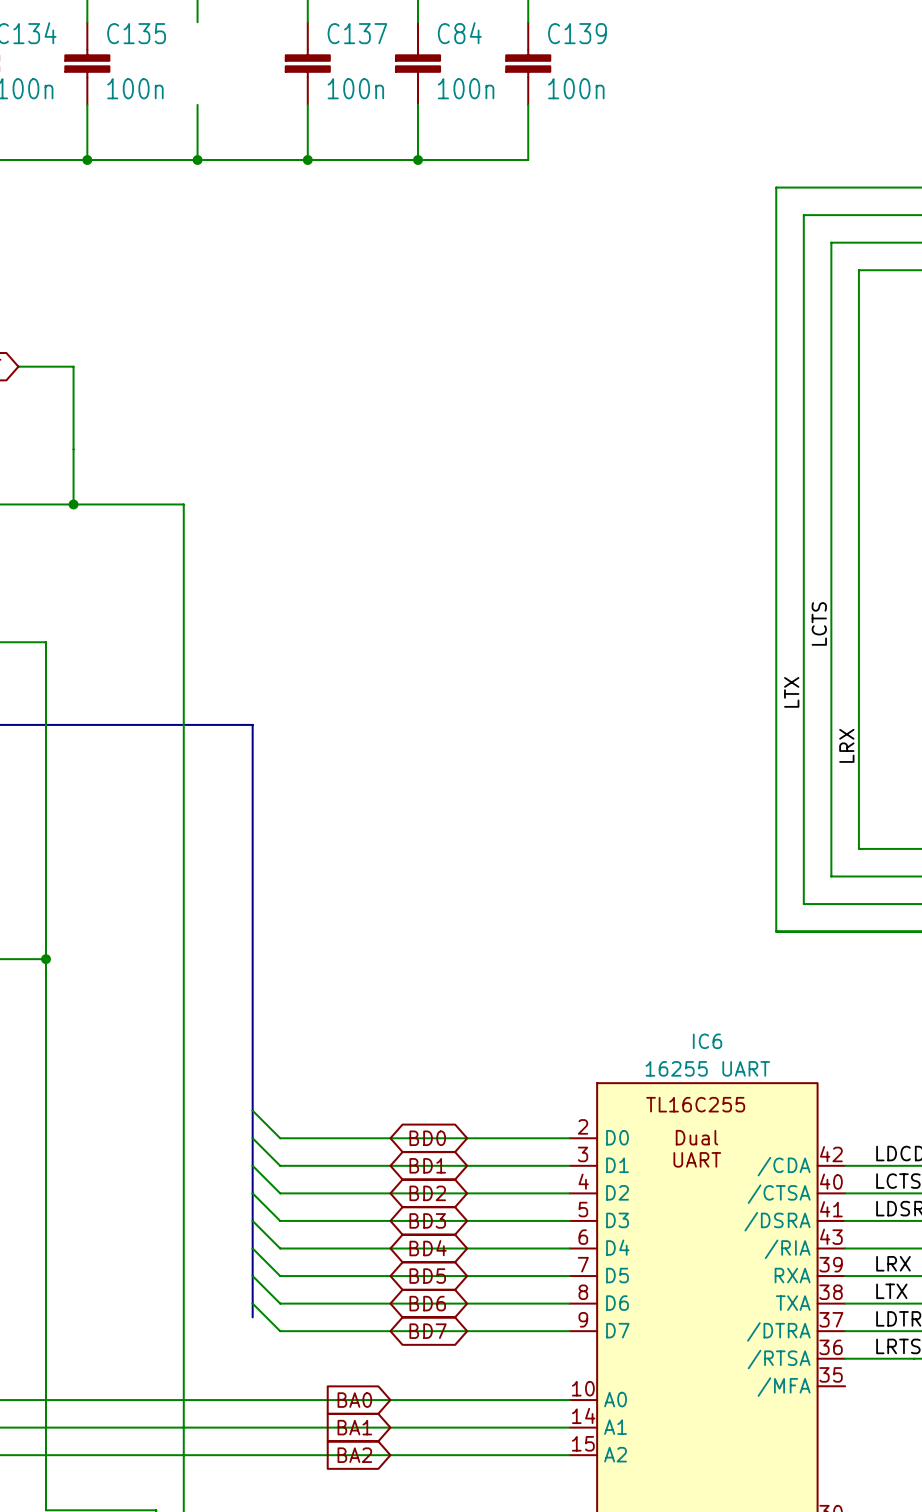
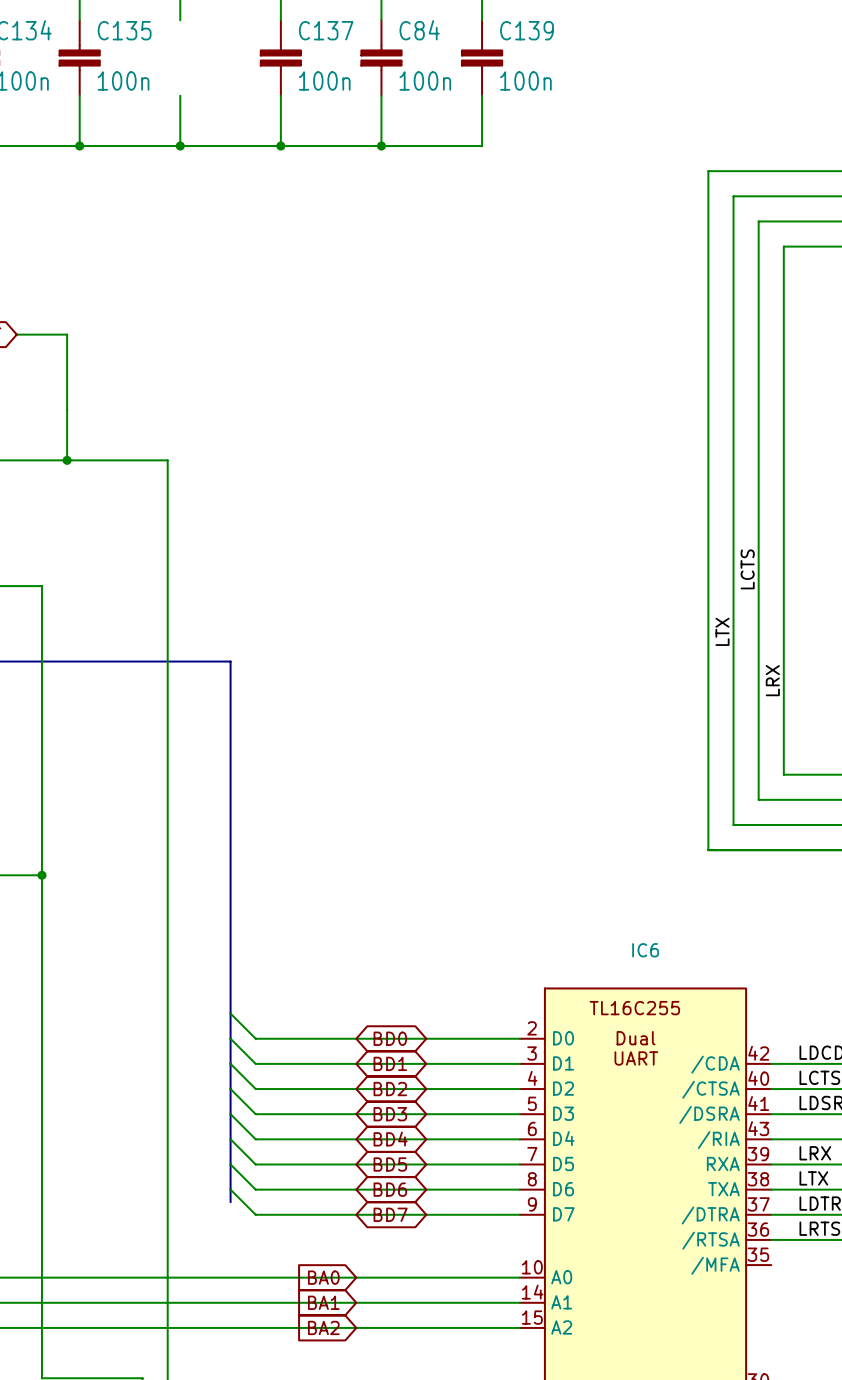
IC6 value: 16255 UART (707, 1068) -> none

